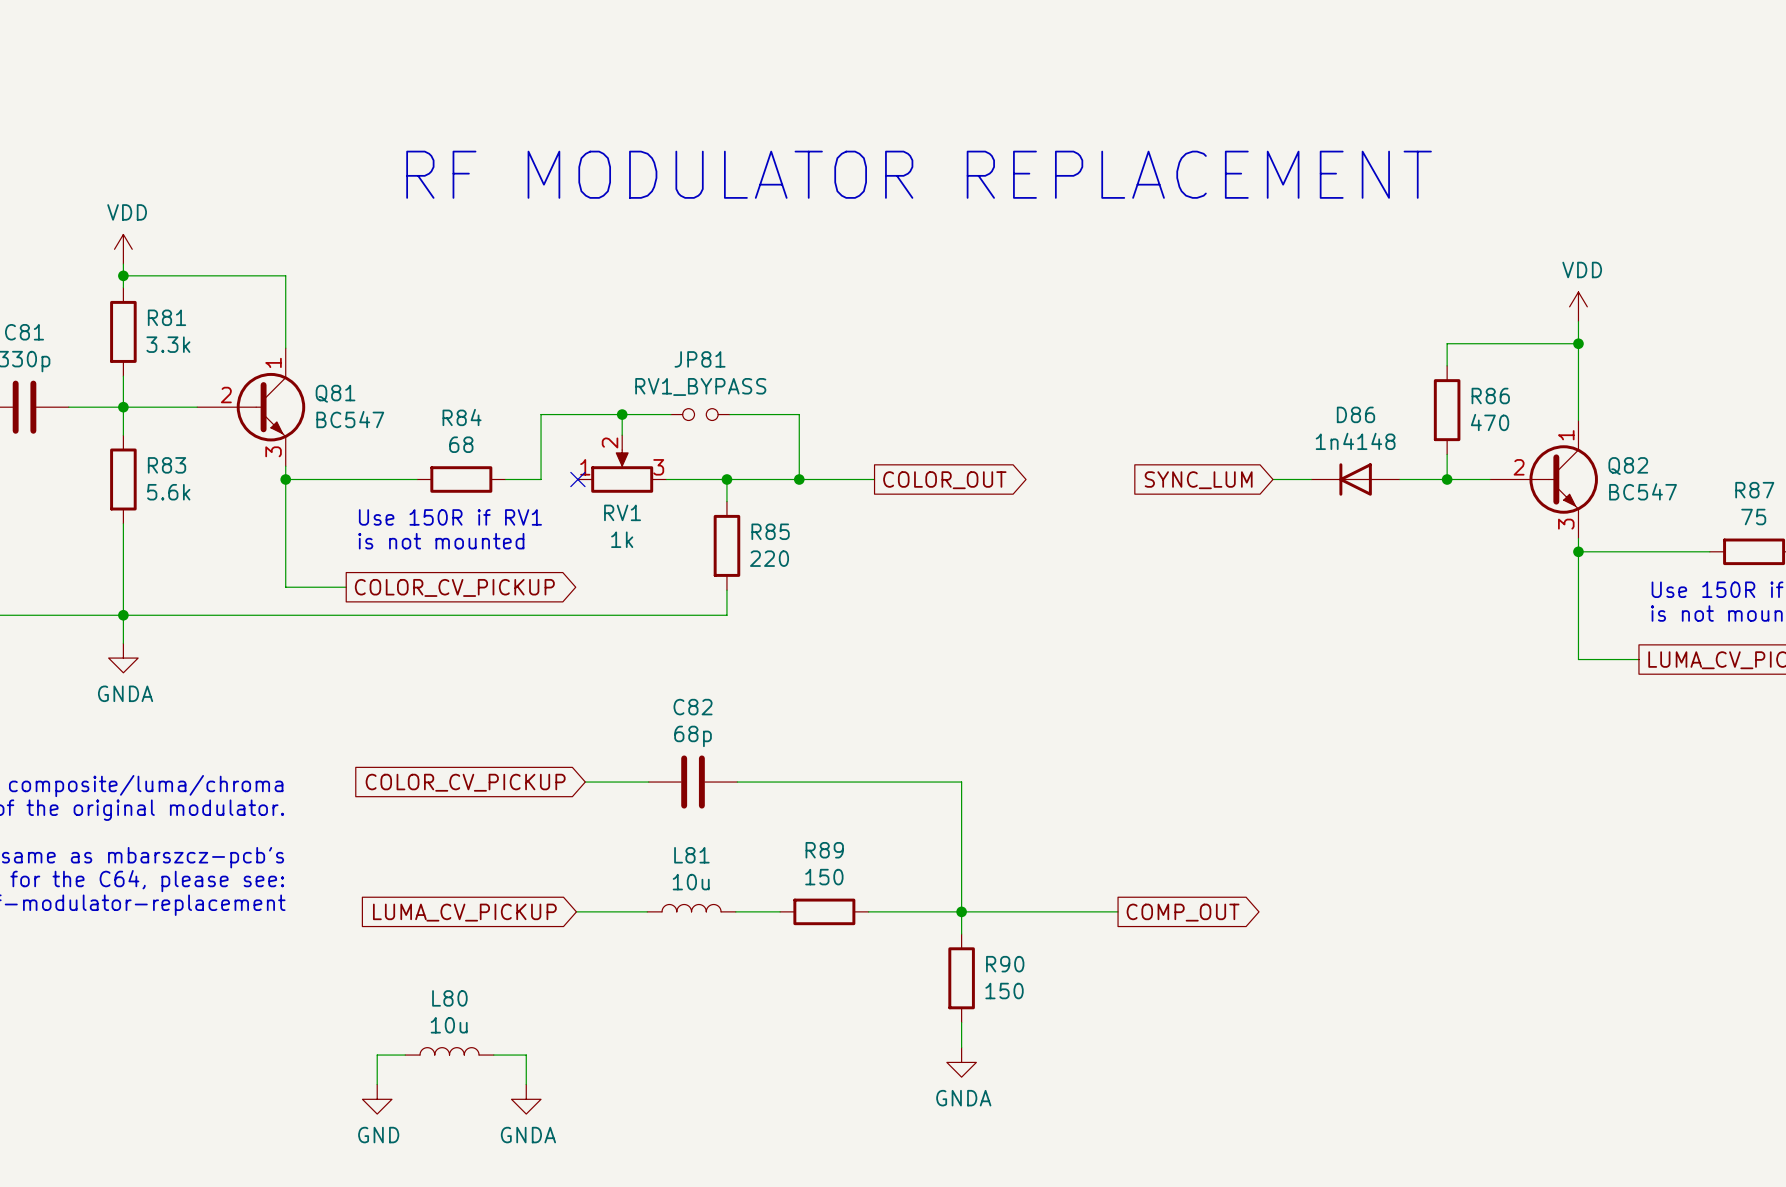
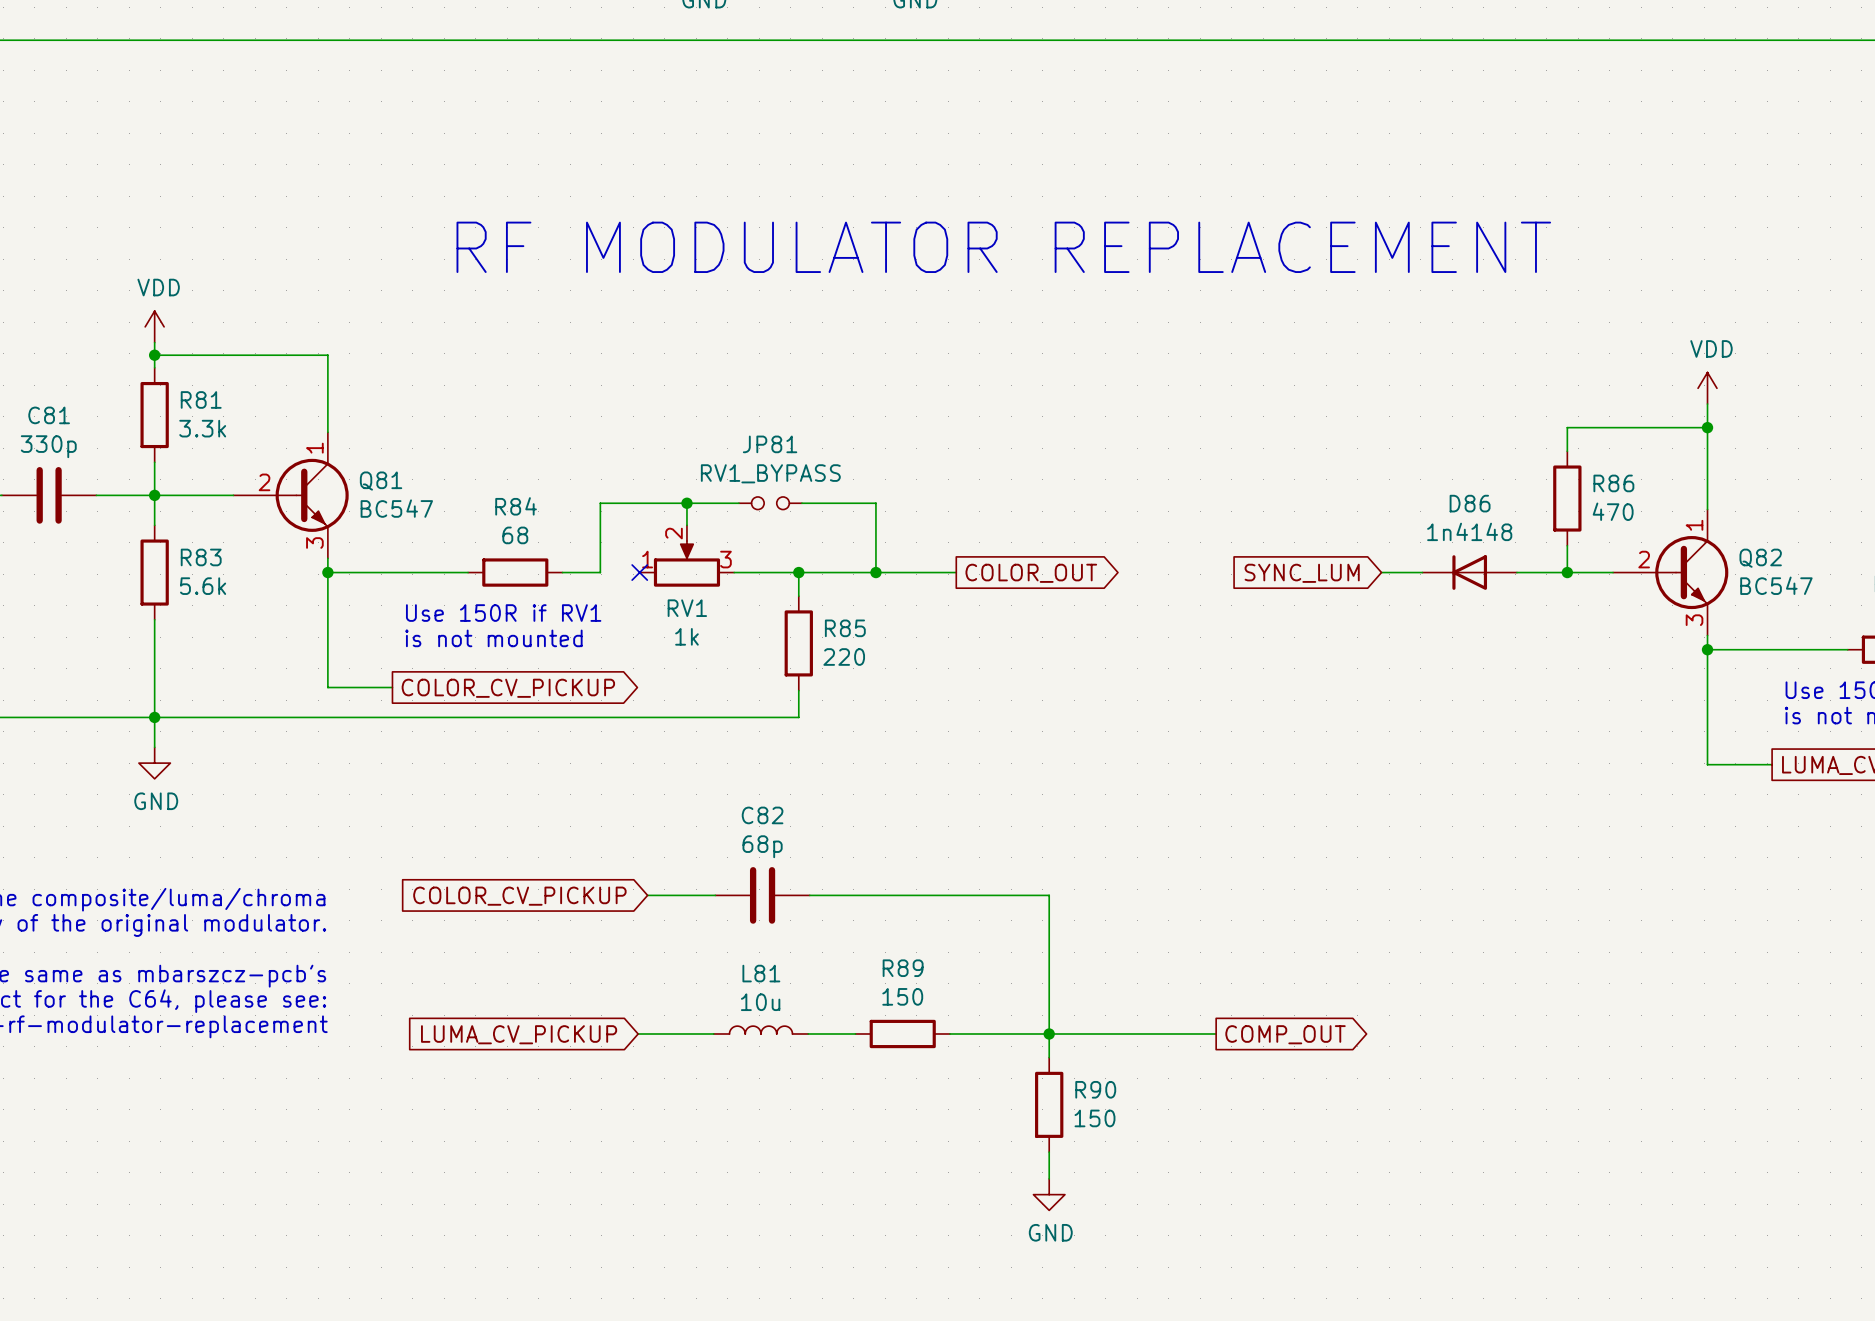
power symbol: GNDA (123, 658) -> GND (154, 763)
L80: 10u (449, 1051) -> none
wire: (405, 1055) (377, 1055) (377, 1084) -> none
wire: (493, 1055) (526, 1055) (526, 1084) -> none
power symbol: GNDA (961, 1062) -> GND (1049, 1194)
power symbol: GND (377, 1099) -> none
power symbol: GNDA (526, 1099) -> none

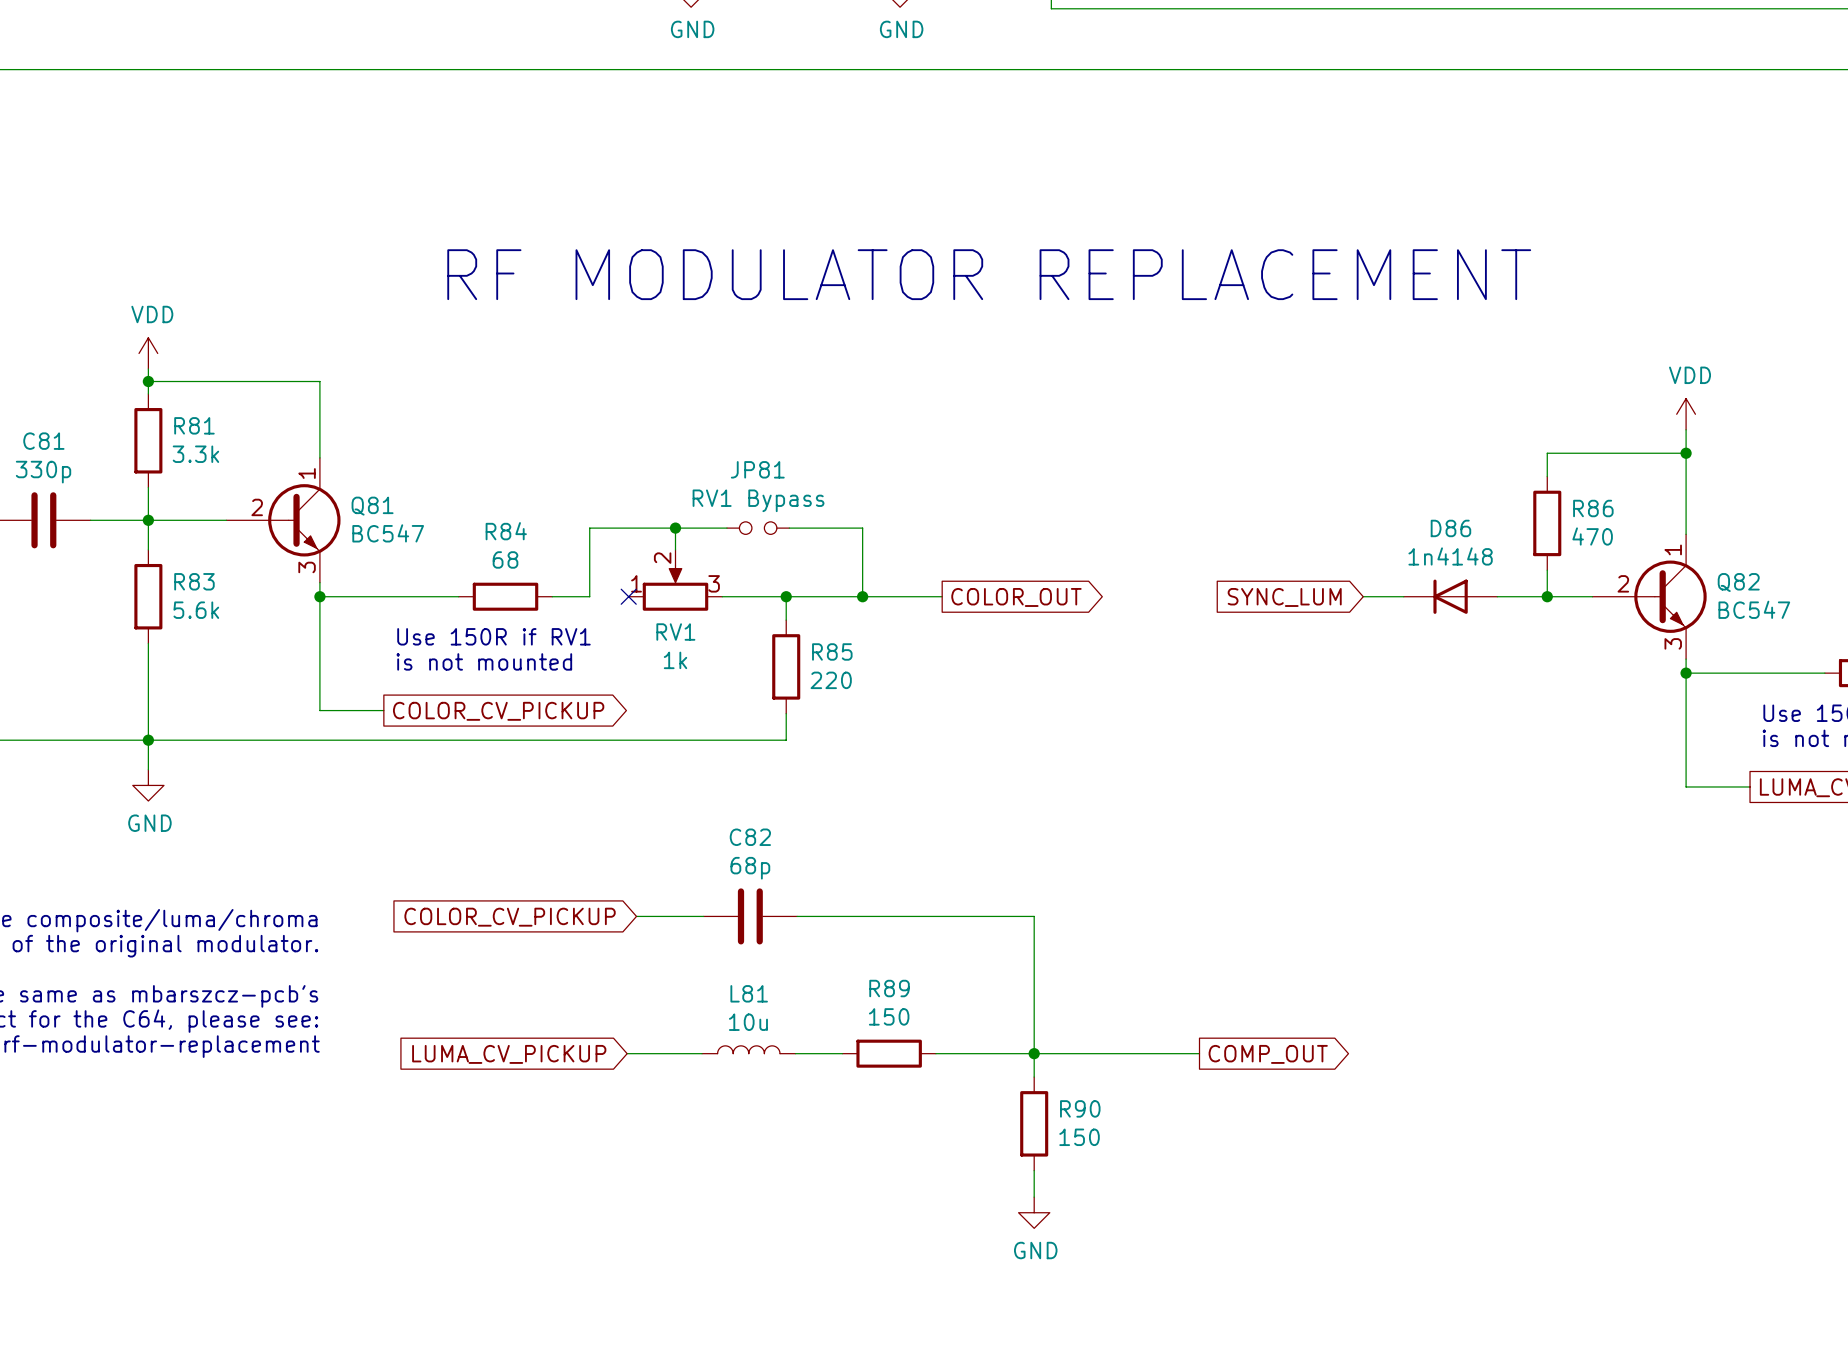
JP81 value: RV1_BYPASS (770, 473) -> RV1 Bypass (758, 500)

